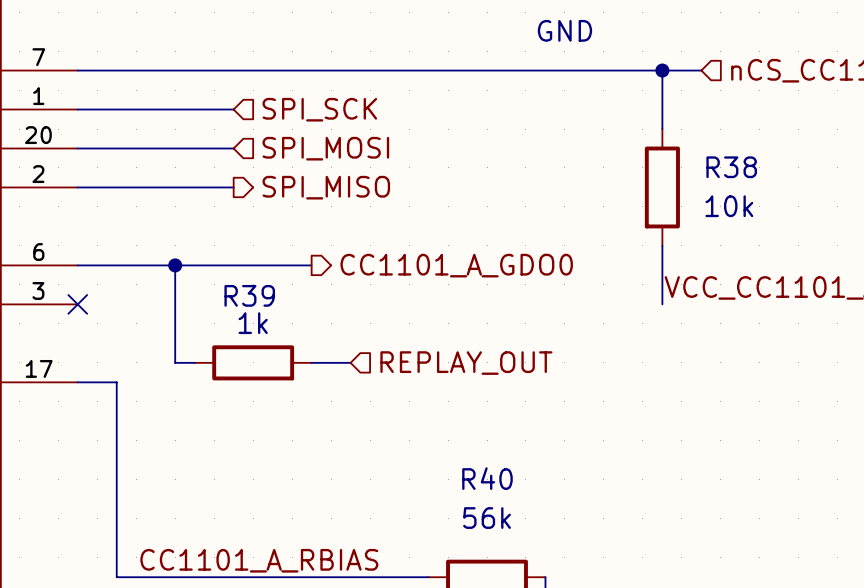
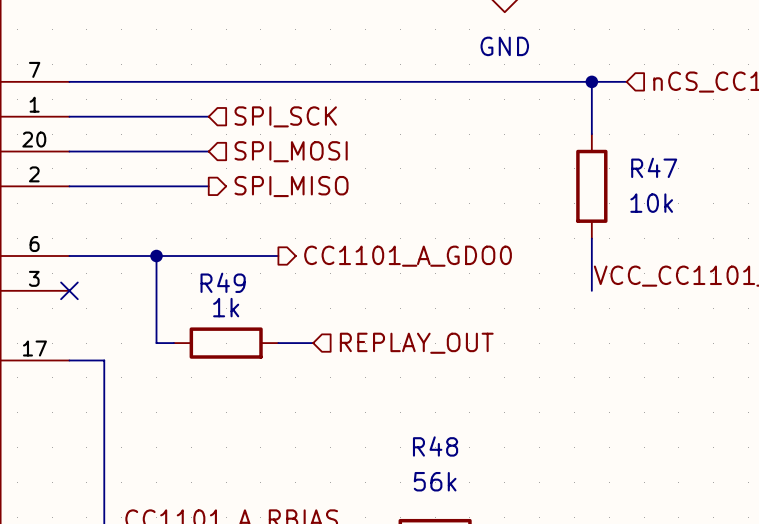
R38 name: R38 (731, 167) -> R47 (654, 167)
R39 name: R39 (249, 295) -> R49 (223, 282)
R40 name: R40 (487, 478) -> R48 (435, 446)

